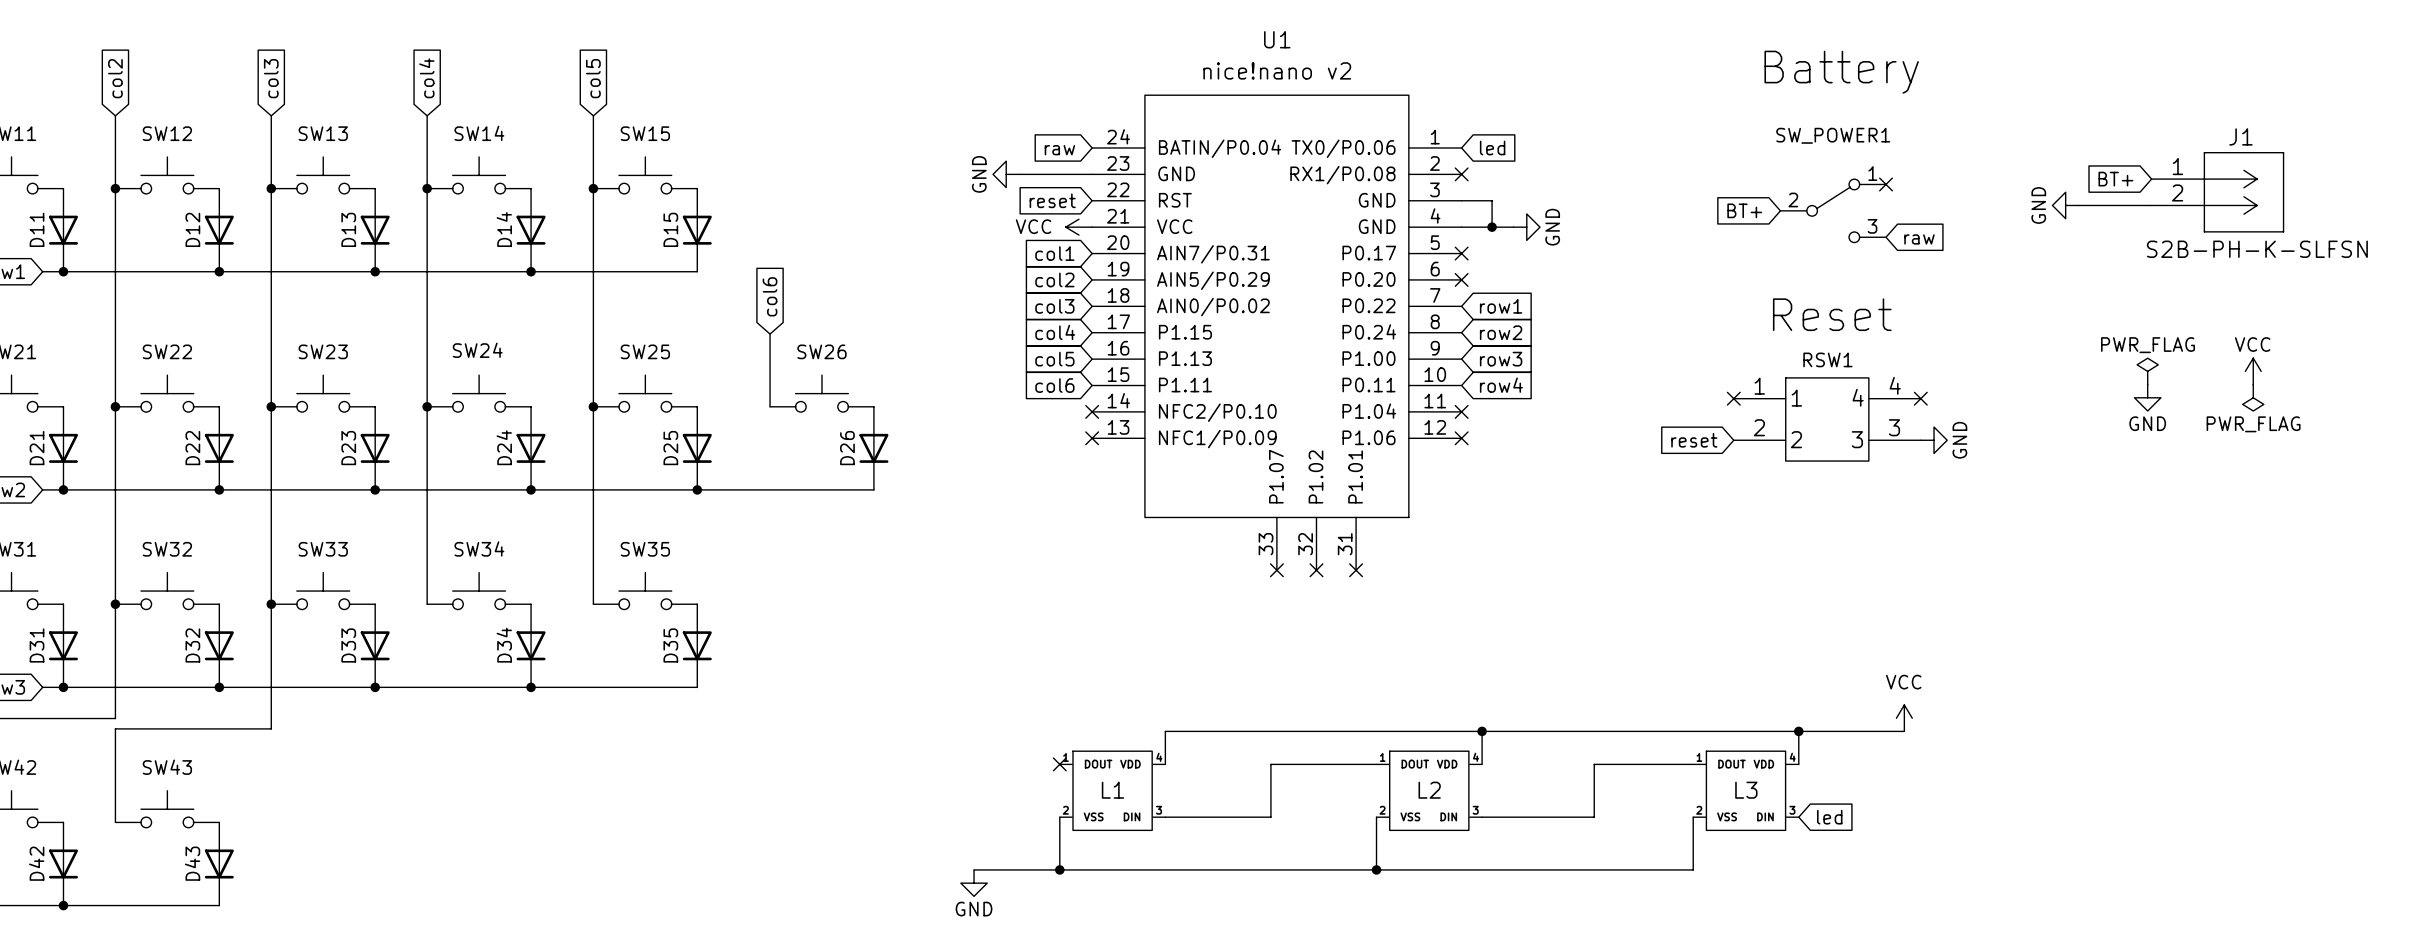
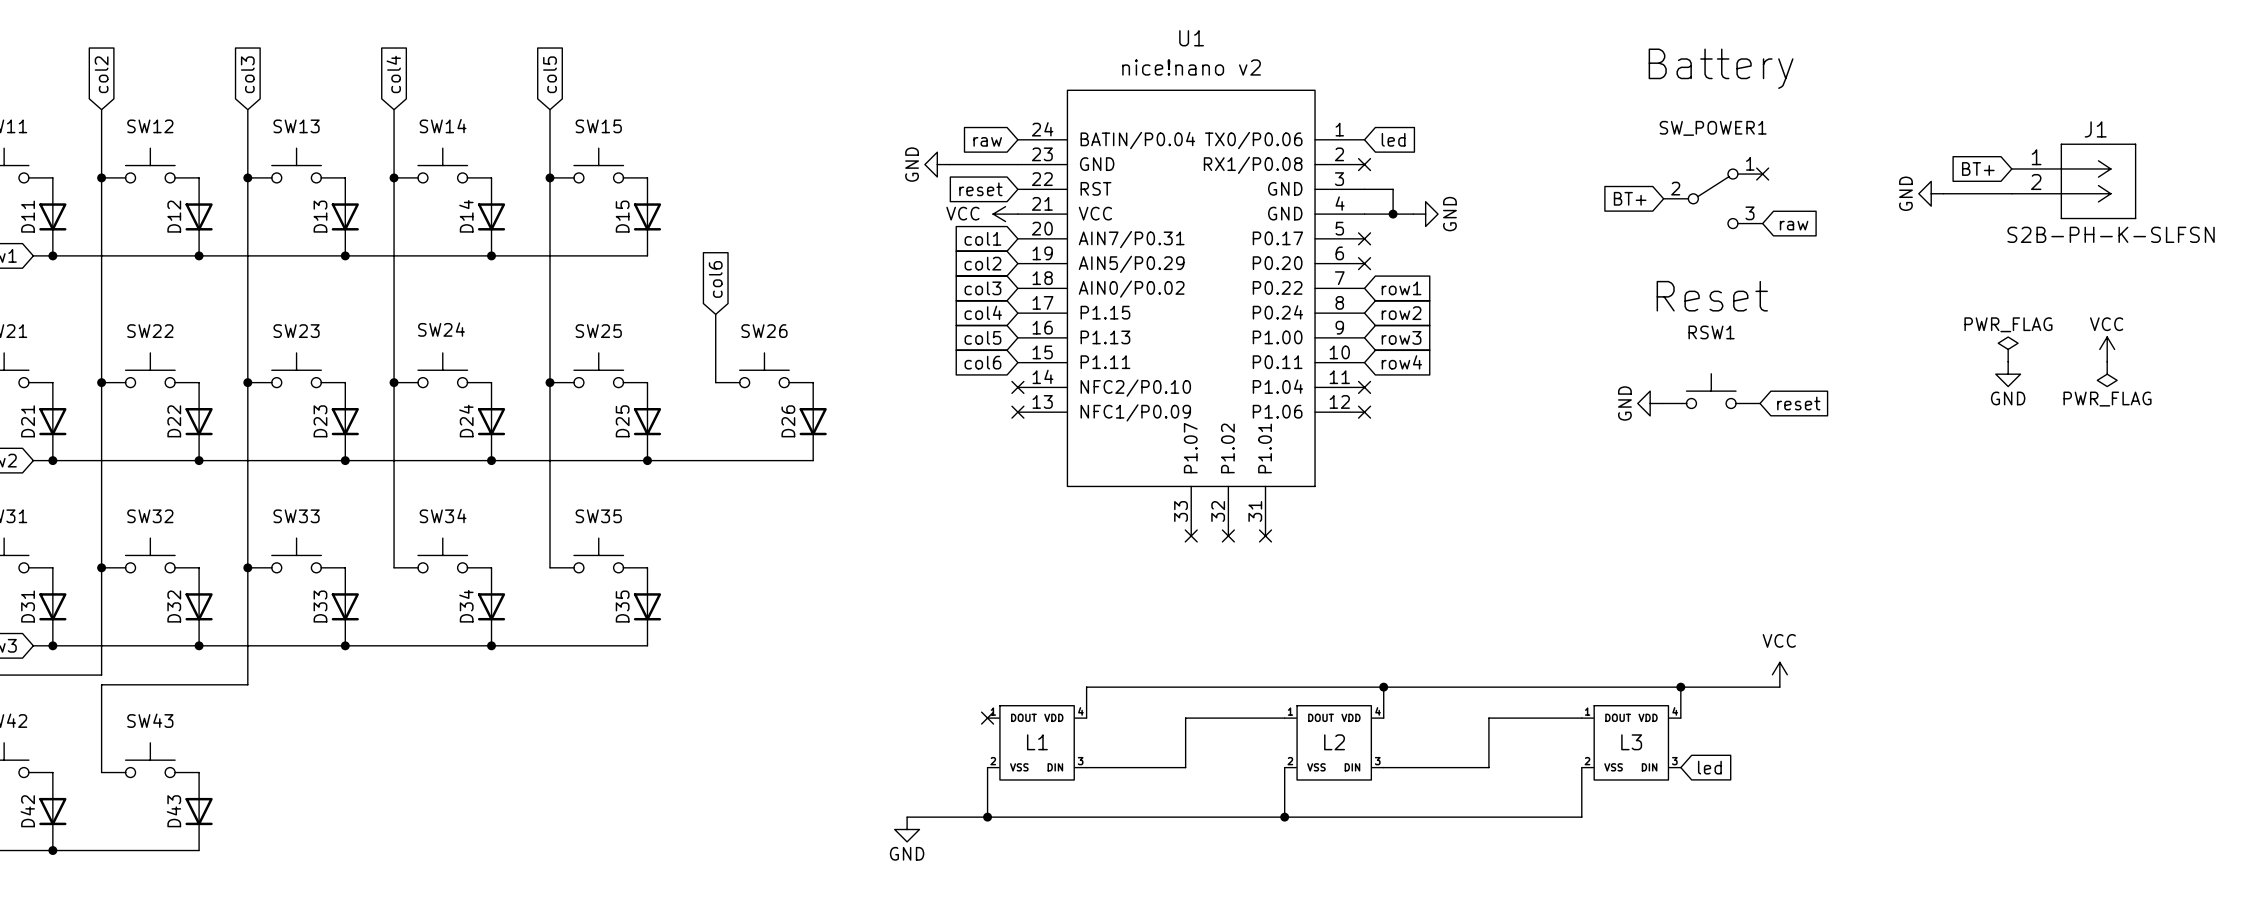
RSW1 symbol: [1733, 377, 1921, 462] -> [1662, 373, 1761, 409]
no-connect mark: (1733, 398) -> none
no-connect mark: (1920, 398) -> none
global label rotation: 0° (1694, 440) -> 180° (1798, 403)
global label position: reset (1694, 440) -> reset (1798, 403)
power symbol rotation: 0° (1934, 440) -> 180° (1650, 403)
power symbol position: GND (1934, 440) -> GND (1650, 403)

